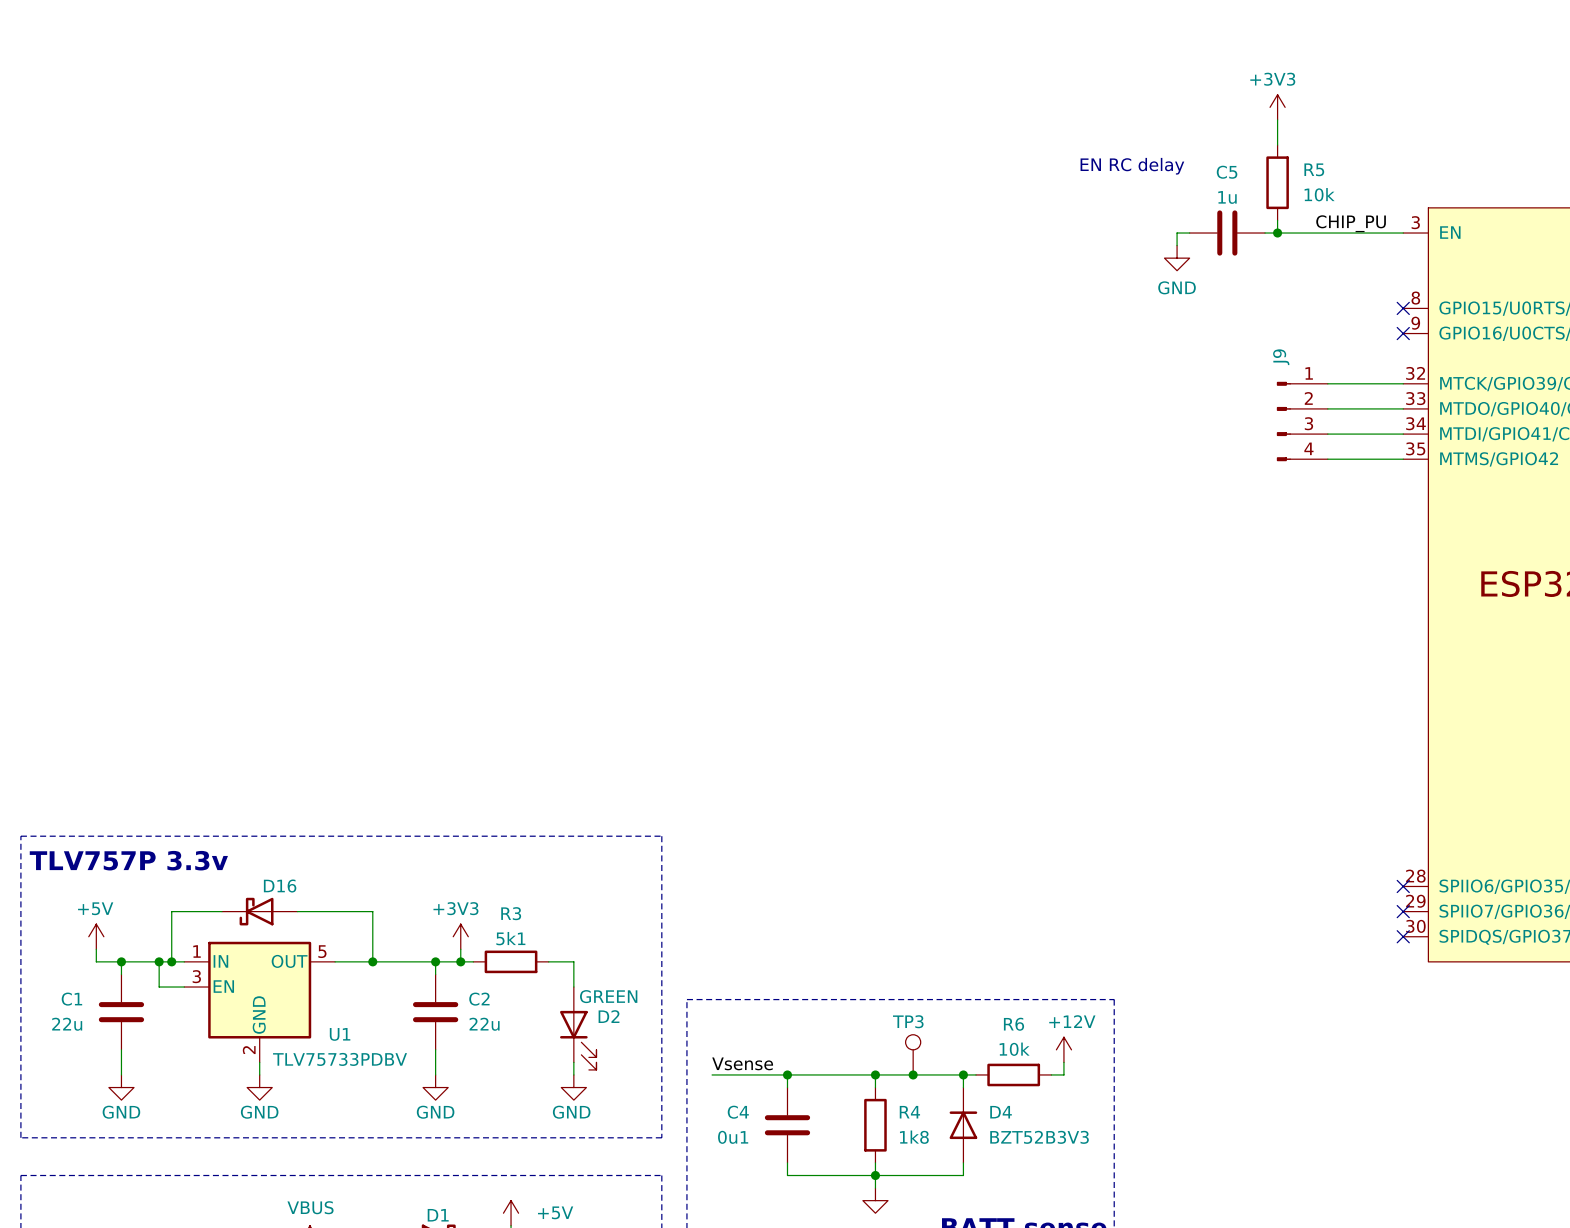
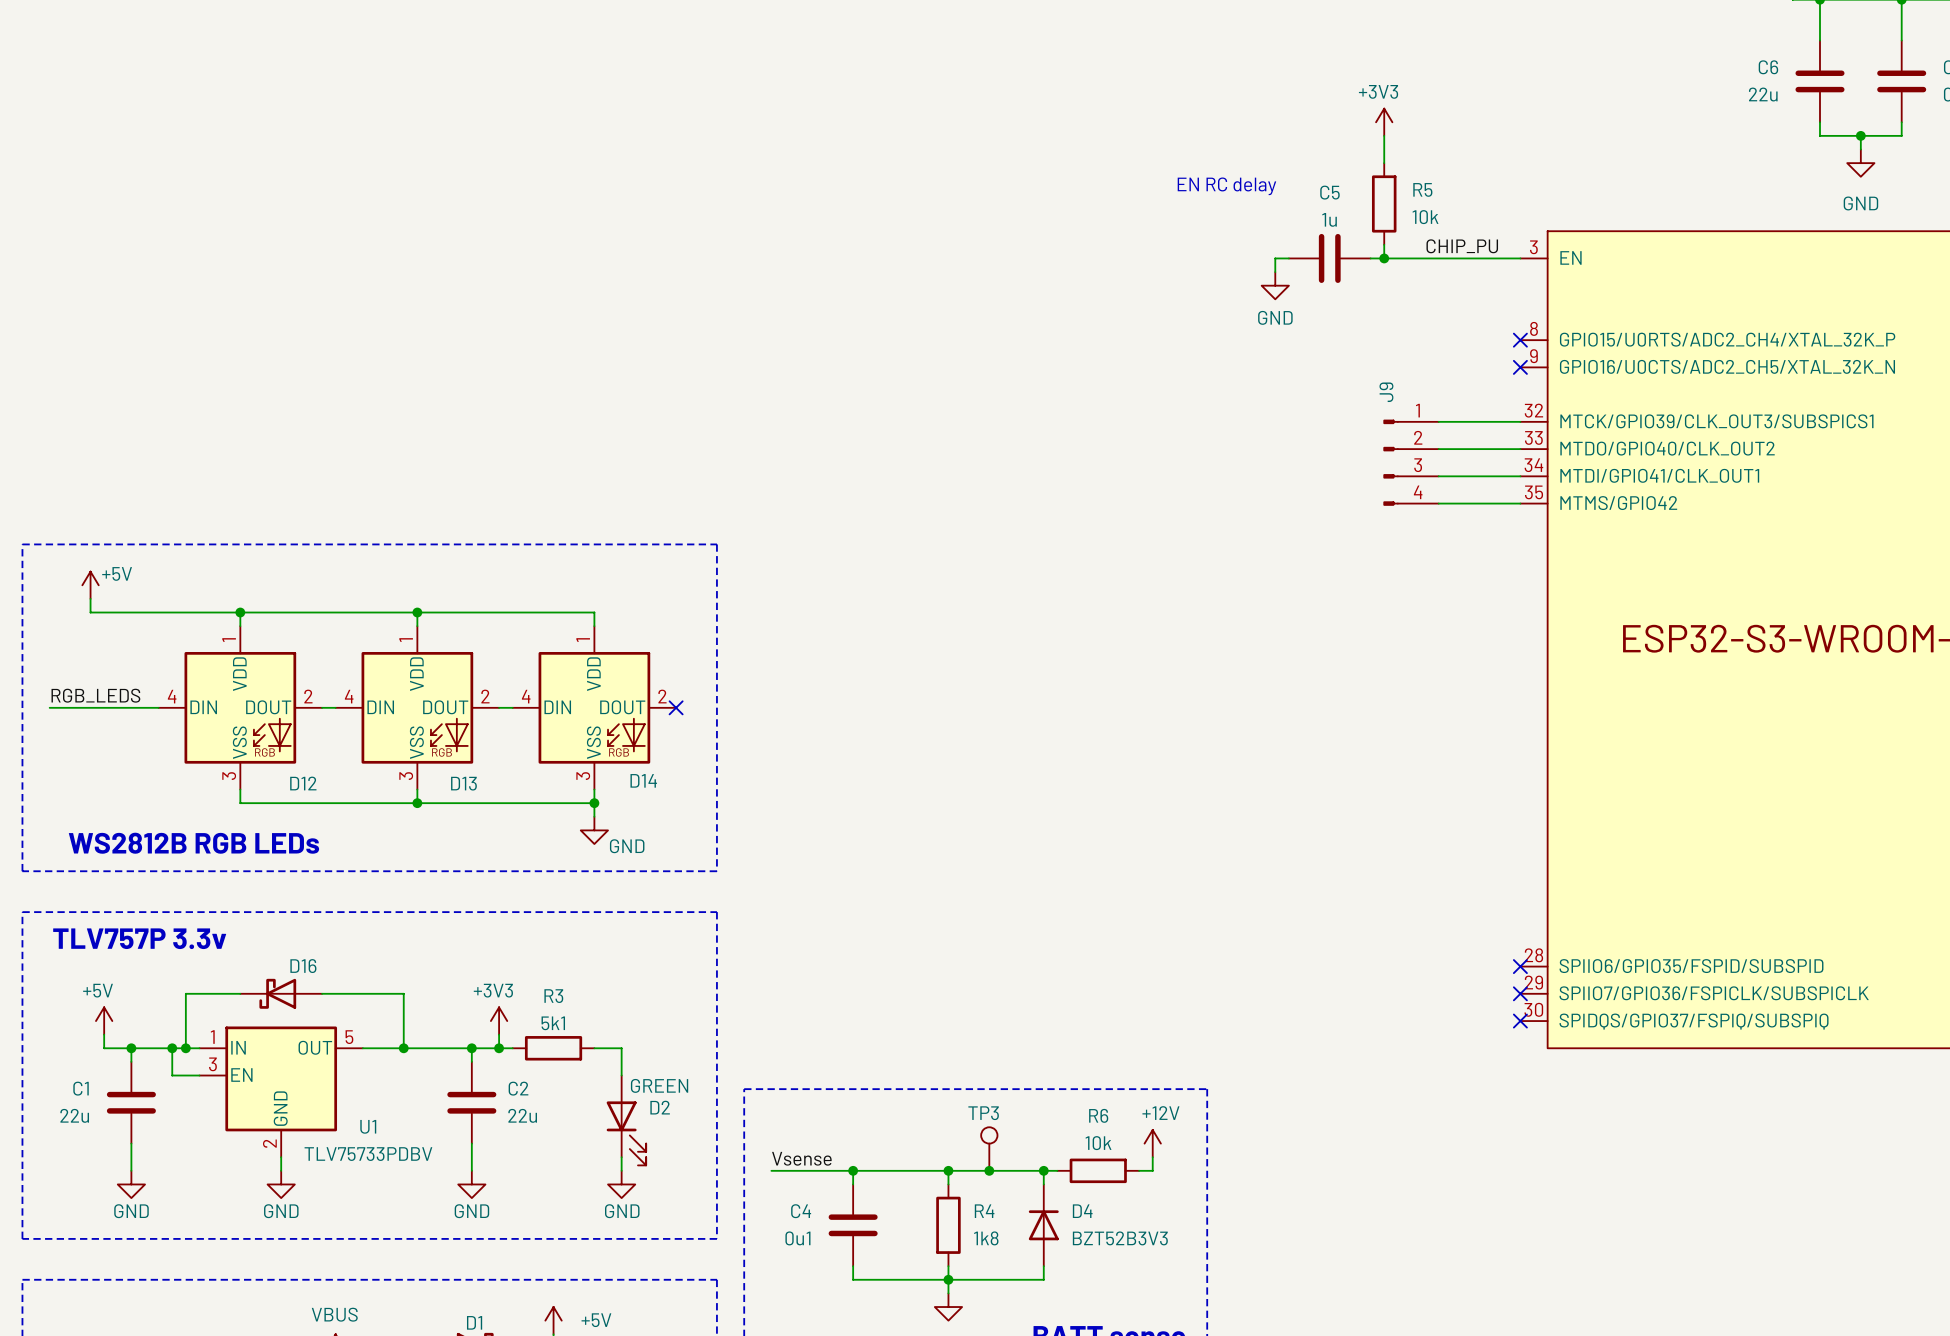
line: none -> (22, 544) (716, 544) (716, 871) (22, 871) (22, 544)
power symbol: none -> +5V (90, 585)
wire: none -> (90, 598) (90, 612) (594, 612) (594, 626)
wire: none -> (240, 612) (240, 626)
junction: none -> (240, 612)
wire: none -> (417, 612) (417, 626)
junction: none -> (417, 612)
label: none -> RGB_LEDS (95, 695)
wire: none -> (49, 707) (158, 707)
D12: none -> (240, 707)
wire: none -> (322, 707) (335, 707)
D13: none -> (417, 707)
wire: none -> (499, 707) (512, 707)
D14: none -> (594, 707)
no-connect mark: none -> (676, 707)
wire: none -> (240, 789) (240, 803) (594, 803)
wire: none -> (417, 789) (417, 803)
wire: none -> (594, 789) (594, 816)
junction: none -> (417, 803)
junction: none -> (594, 803)
power symbol: none -> GND (594, 830)
text: none -> WS2812B RGB LEDs (193, 843)

